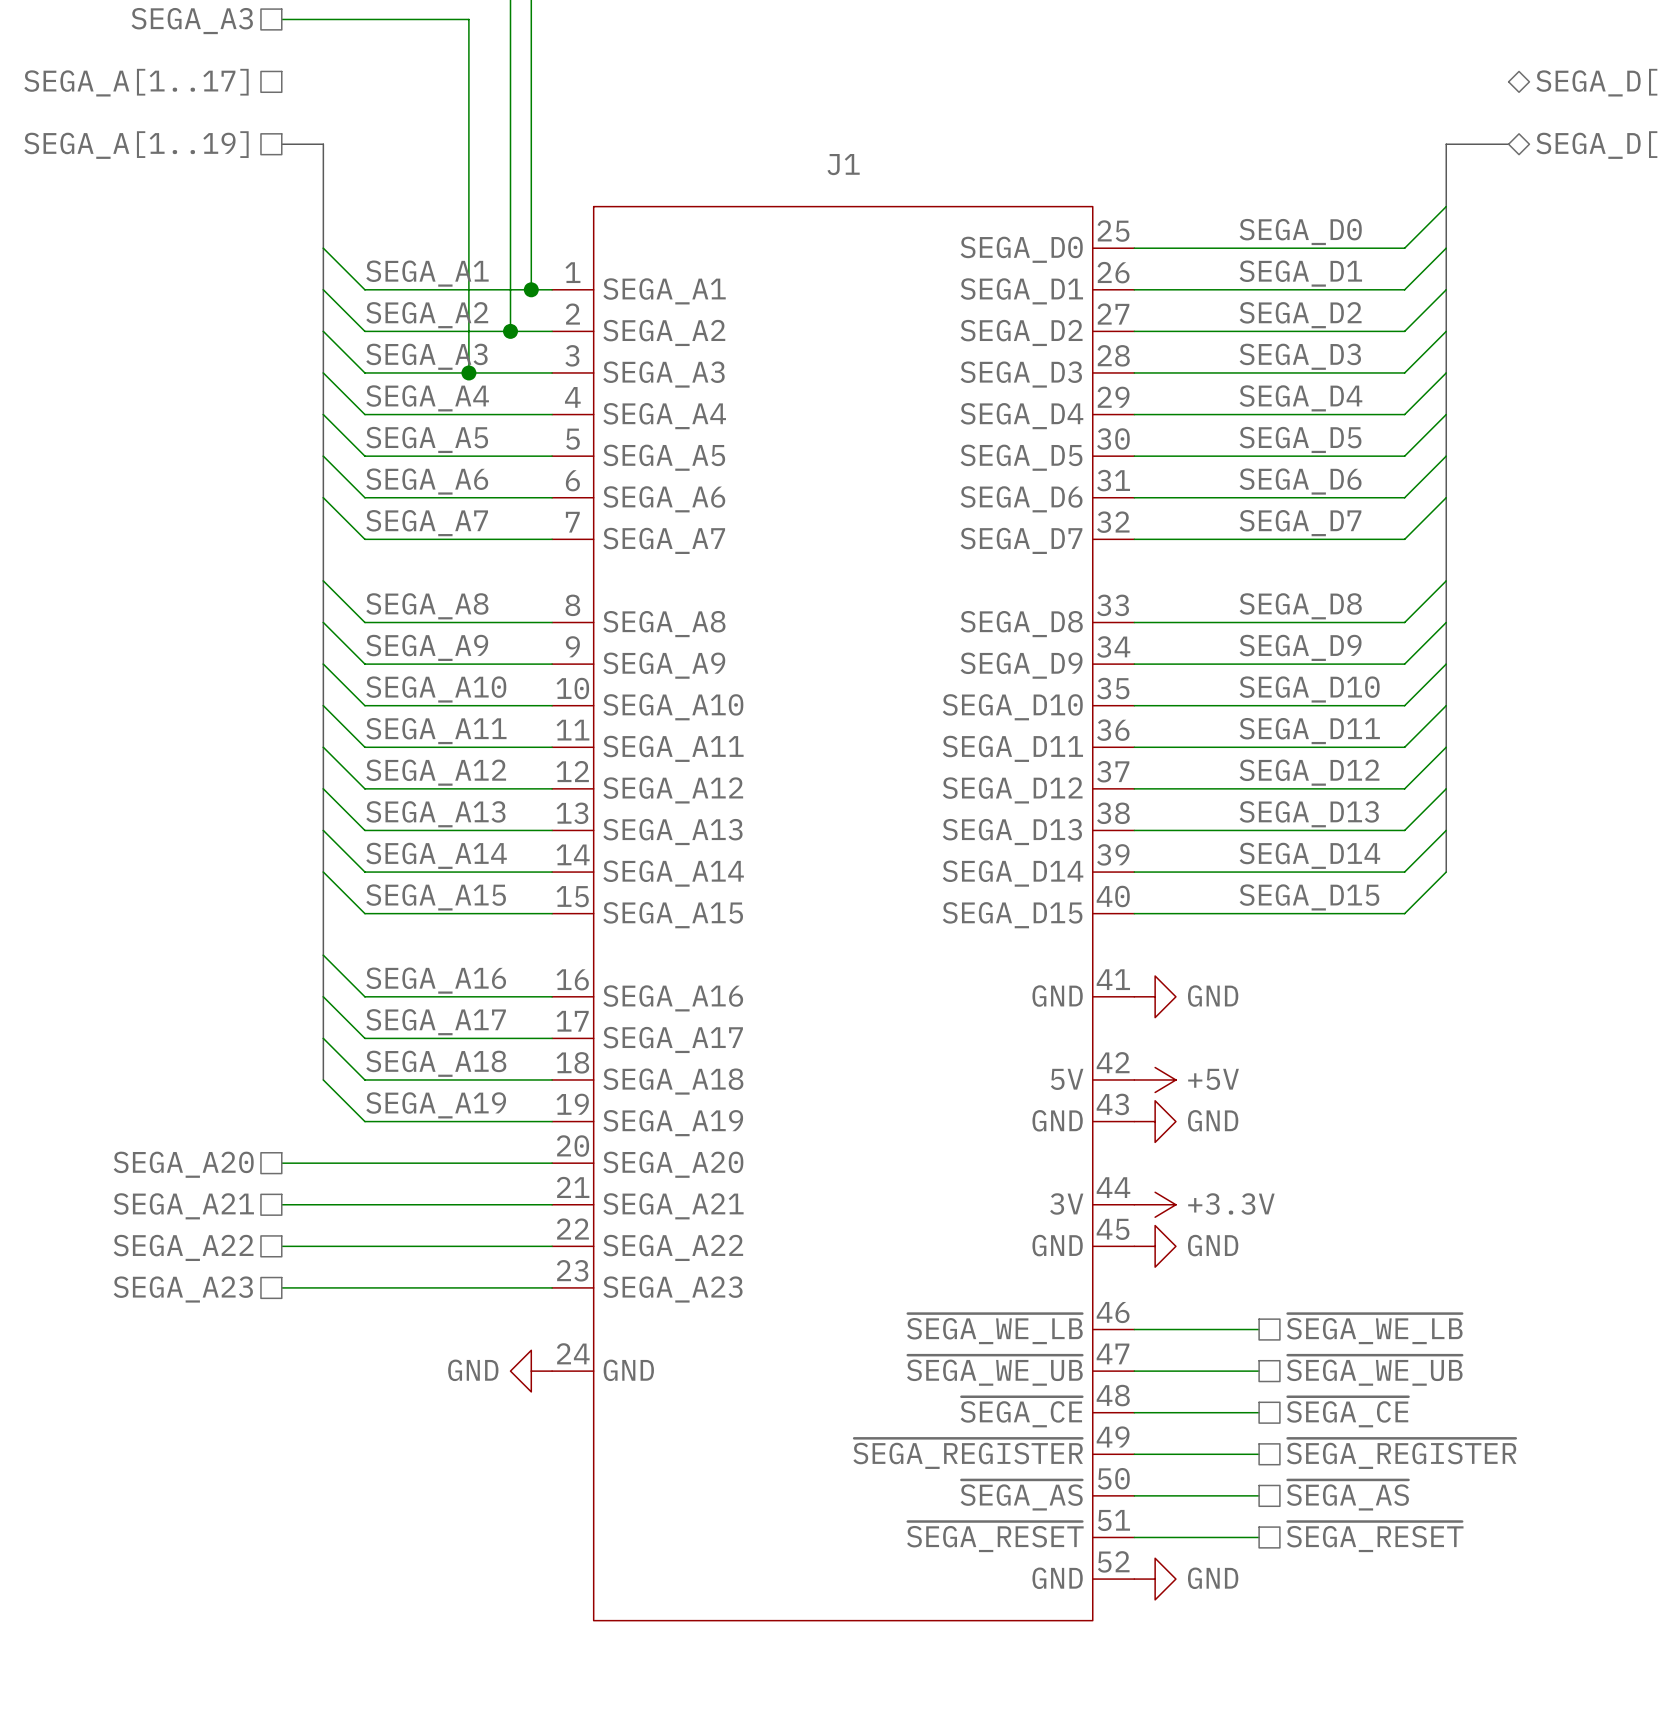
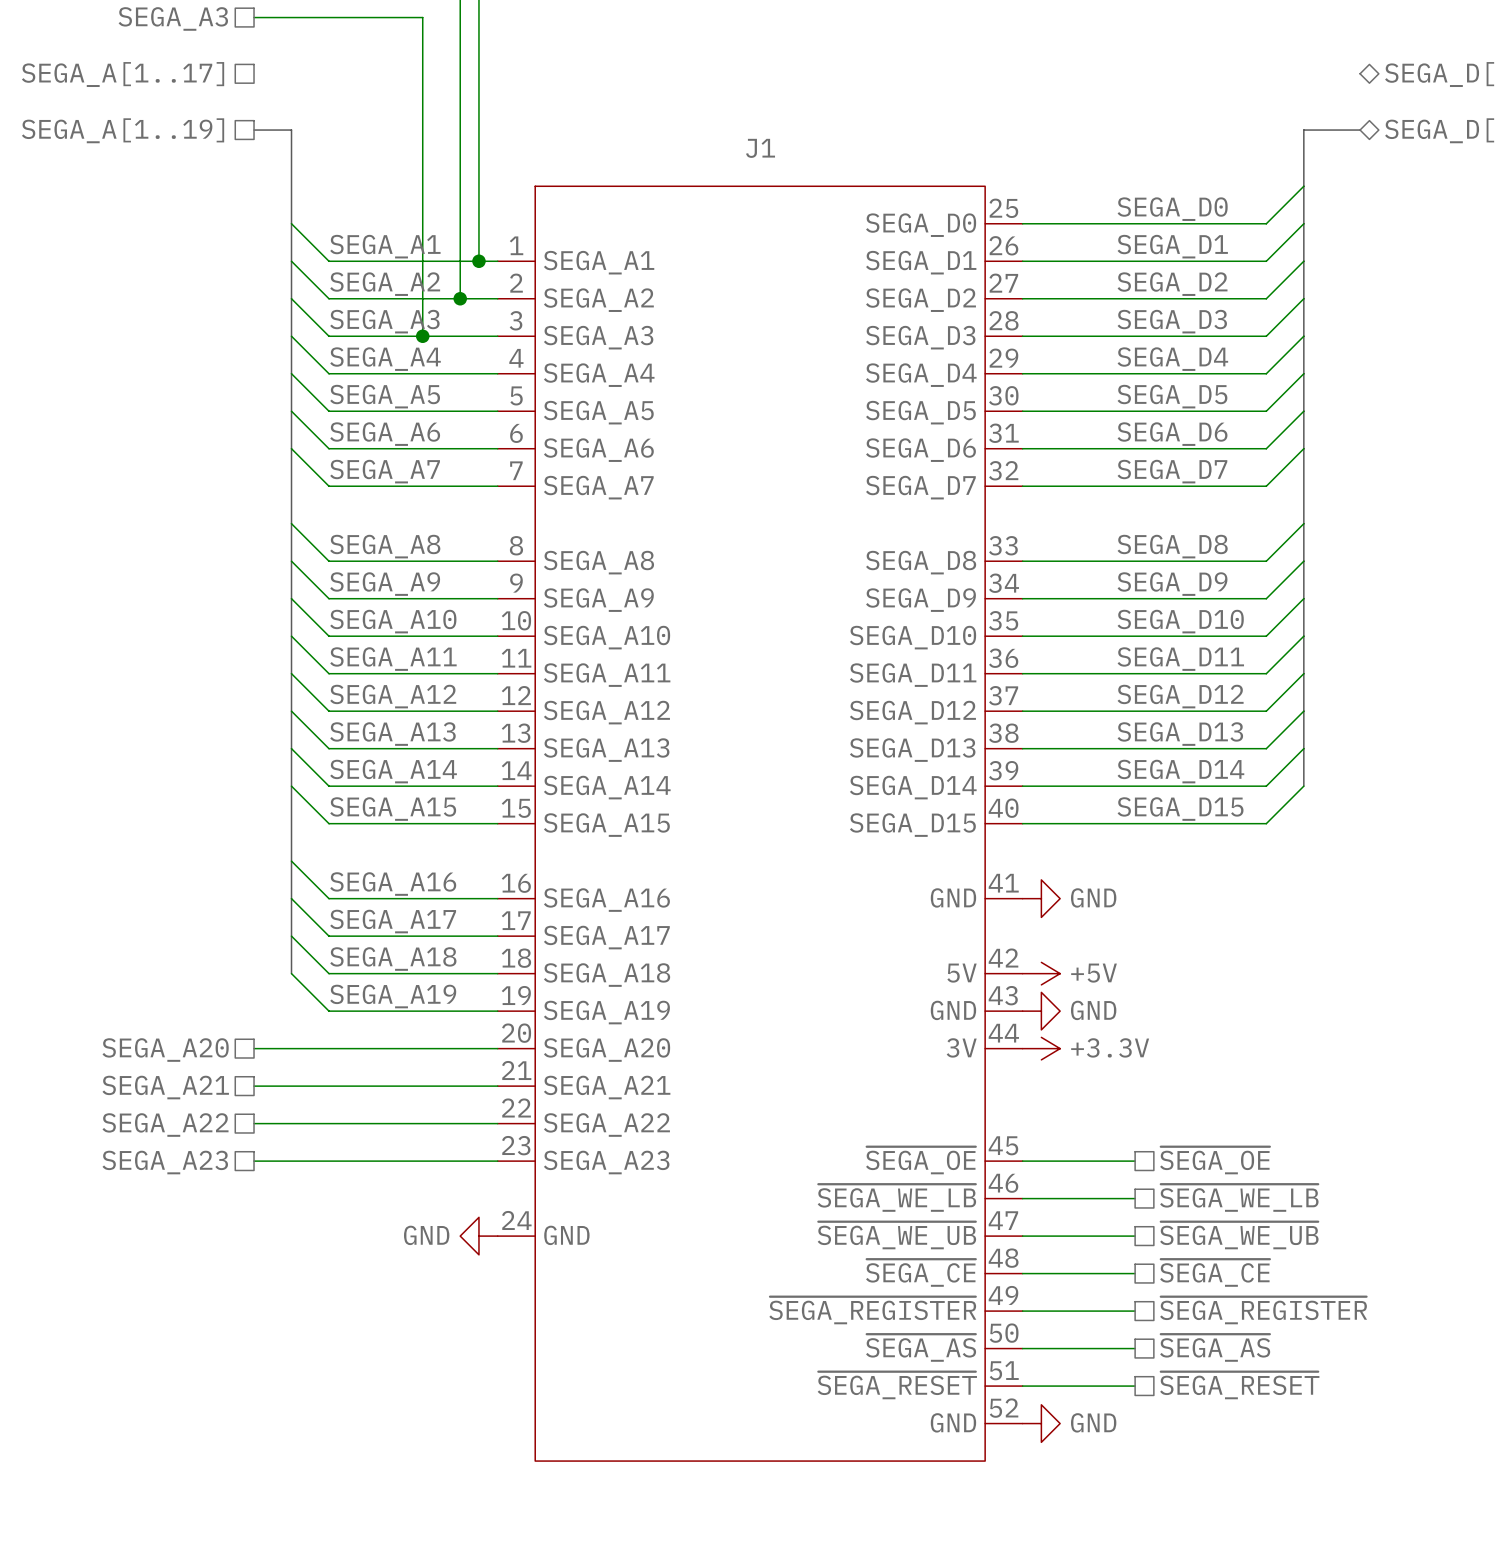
J1 symbol: [552, 206, 1135, 1621] -> [497, 186, 1023, 1462]
power symbol position: +3.3V (1155, 1204) -> +3.3V (1041, 1048)
power symbol: GND (1155, 1246) -> none
wire: none -> (1022, 1161) (1135, 1161)
hierarchical label: none -> ~{SEGA_OE} (1214, 1160)

